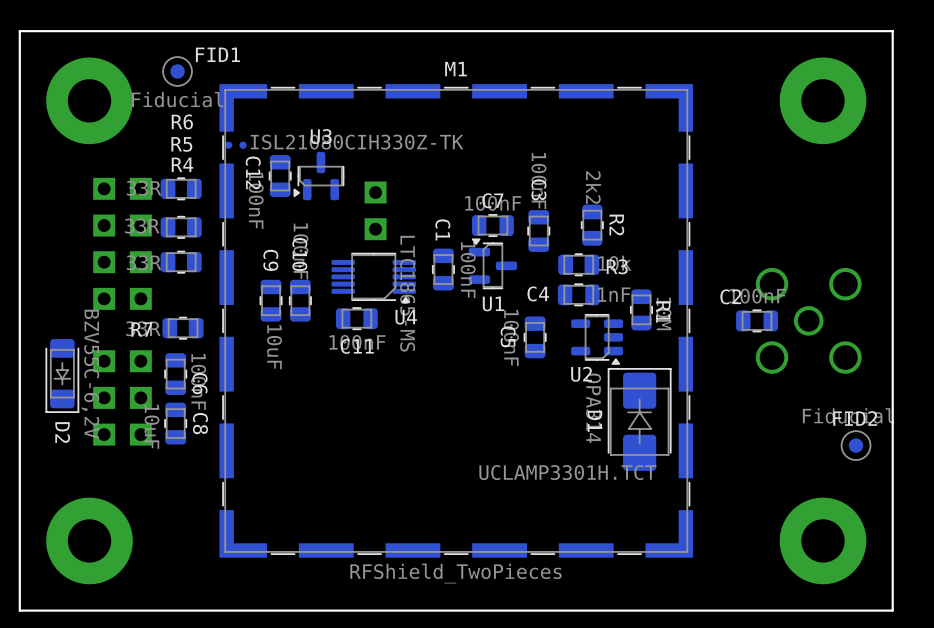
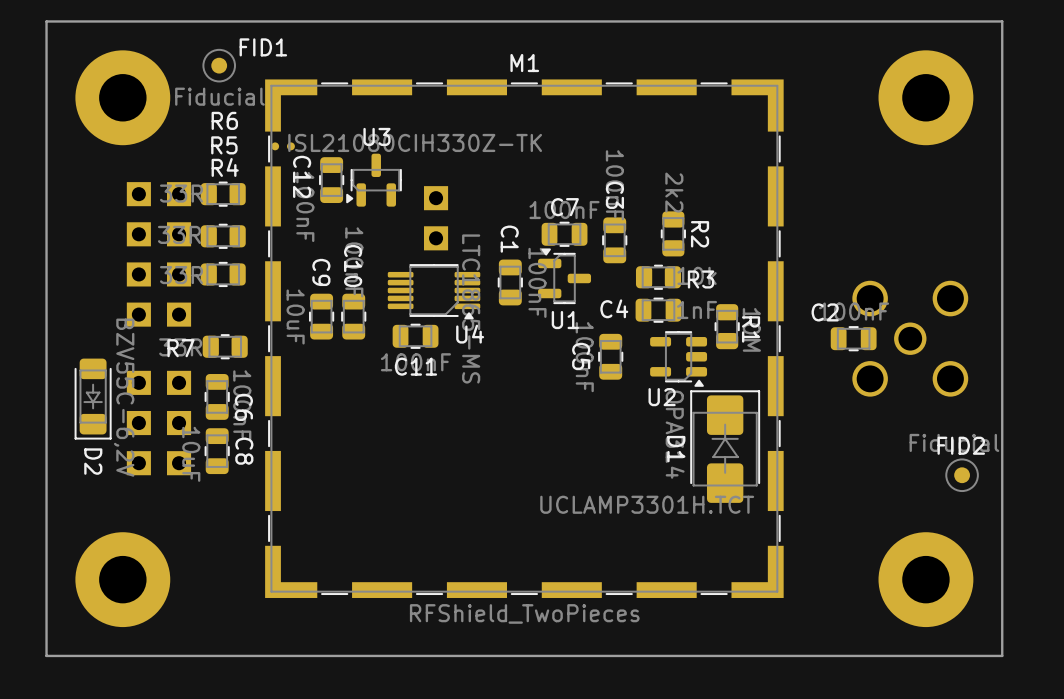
C9 value position: 10uF (274, 347) -> 10uF (295, 316)

